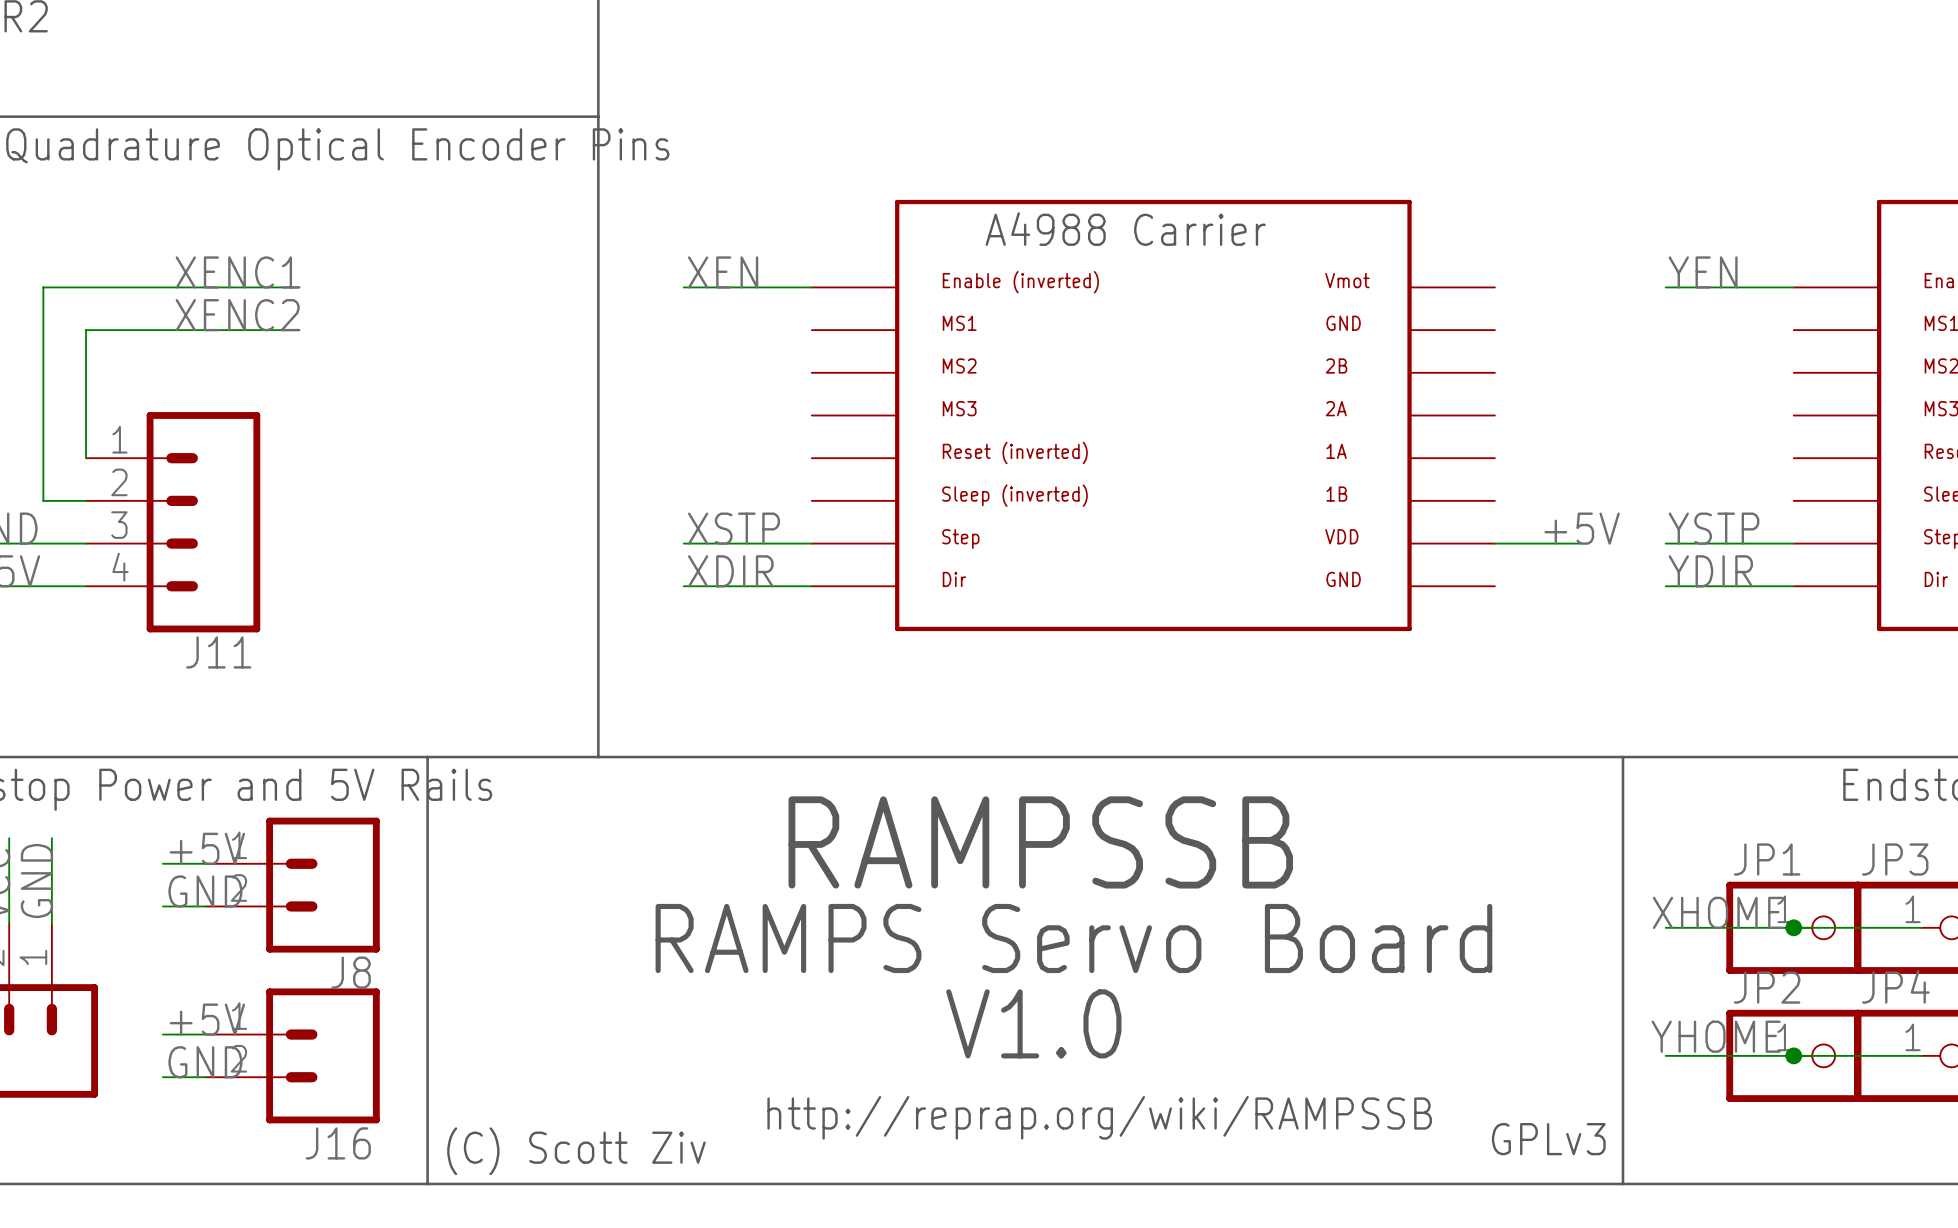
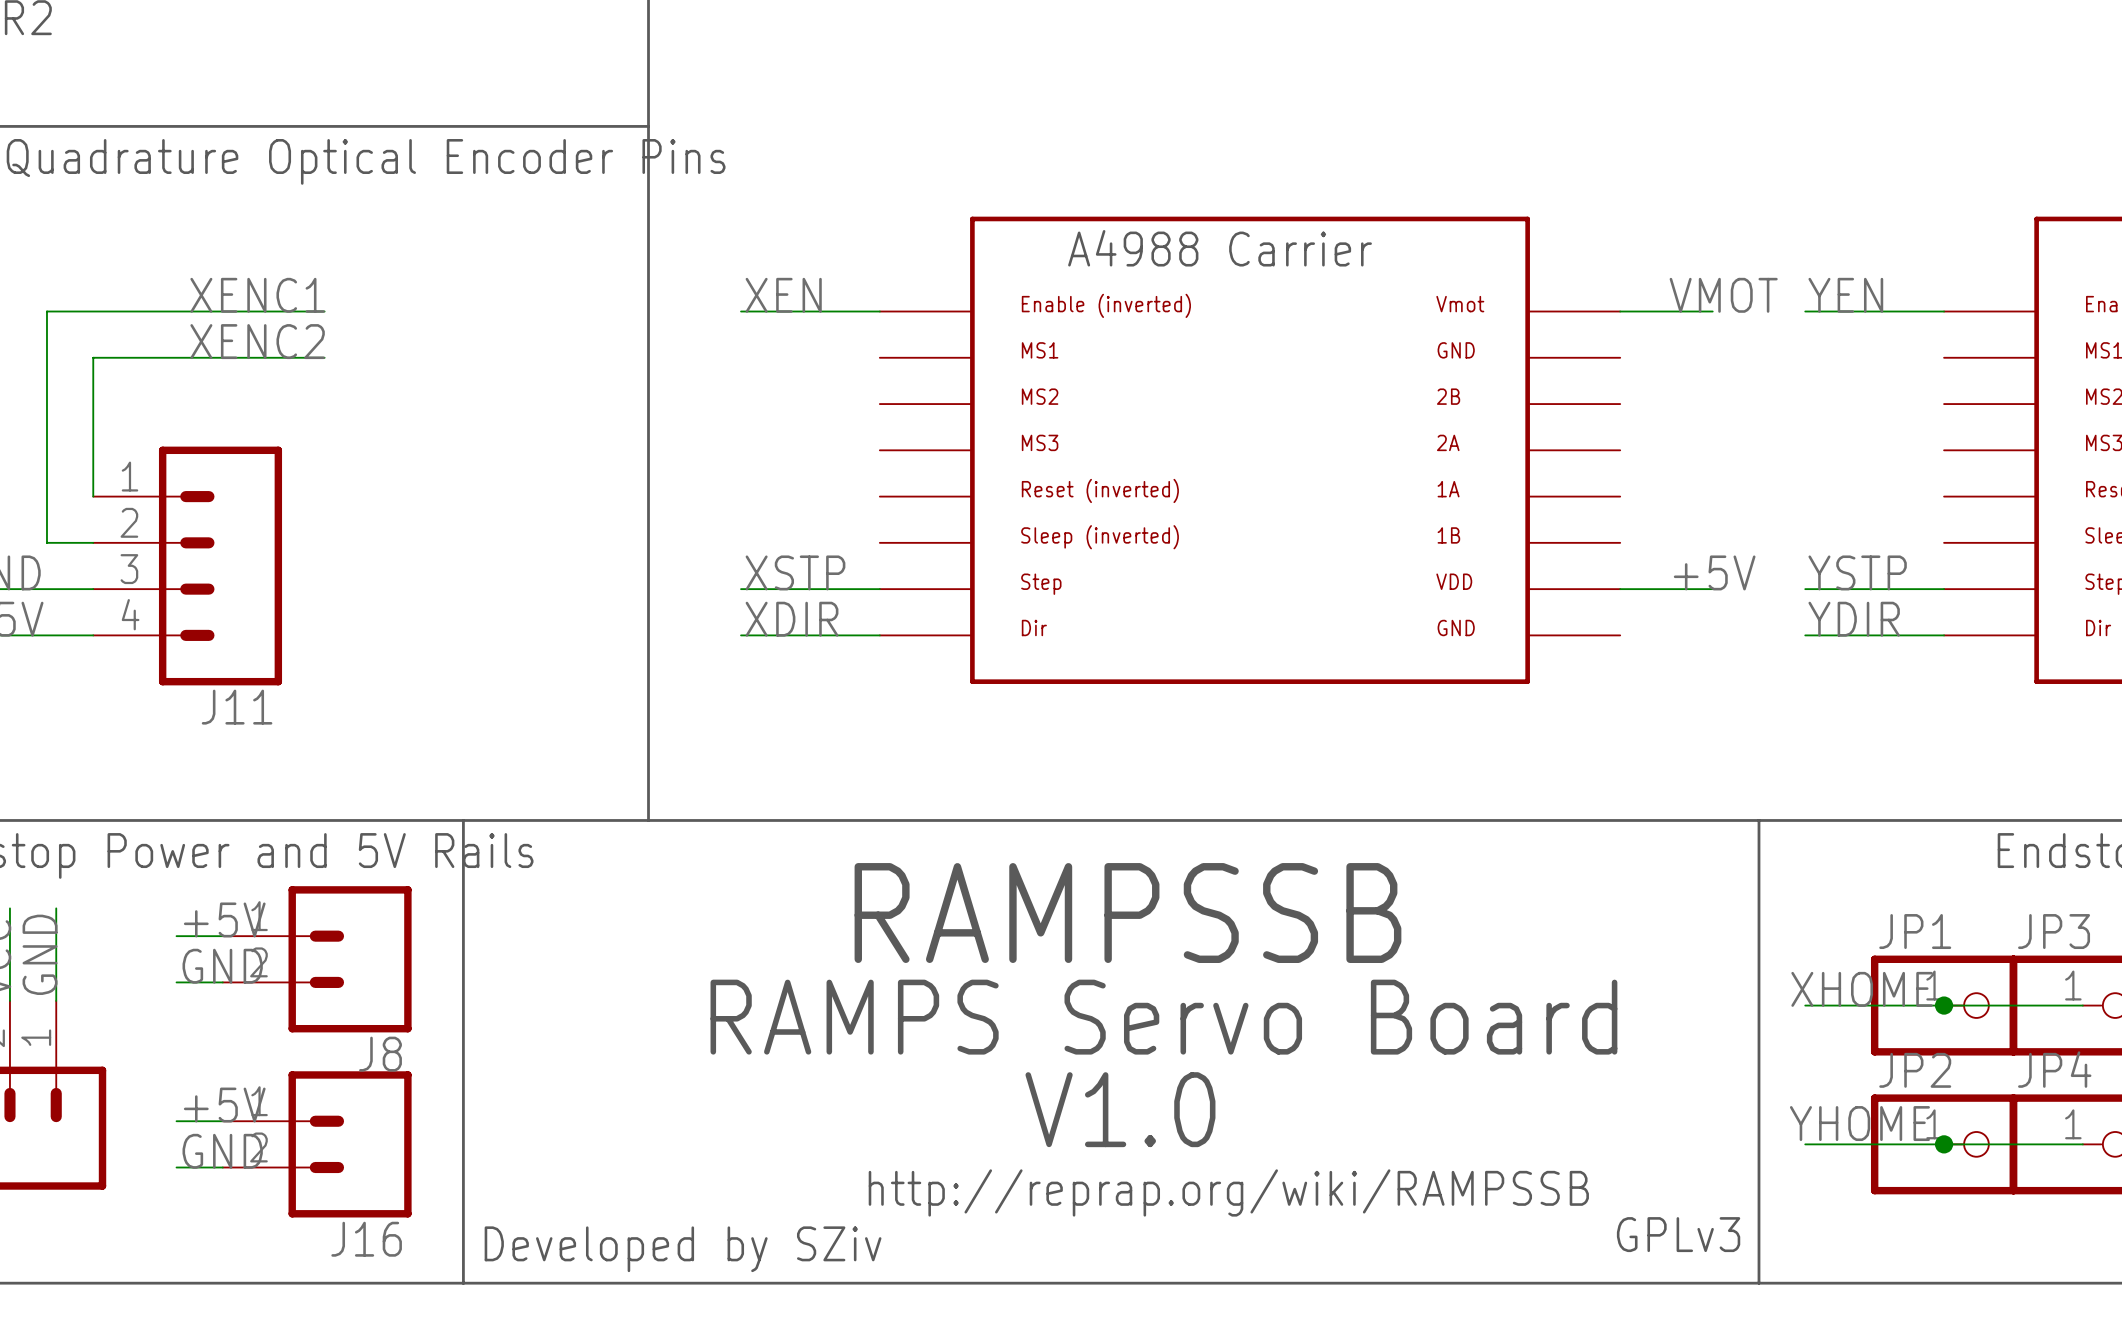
label: none -> VMOT (1723, 295)
wire: none -> (1620, 311) (1712, 311)
text position: http://reprap.org/wiki/RAMPSSB (1099, 1117) -> http://reprap.org/wiki/RAMPSSB (1228, 1192)
text: (C) Scott Ziv (576, 1151) -> Developed by SZiv (683, 1249)

